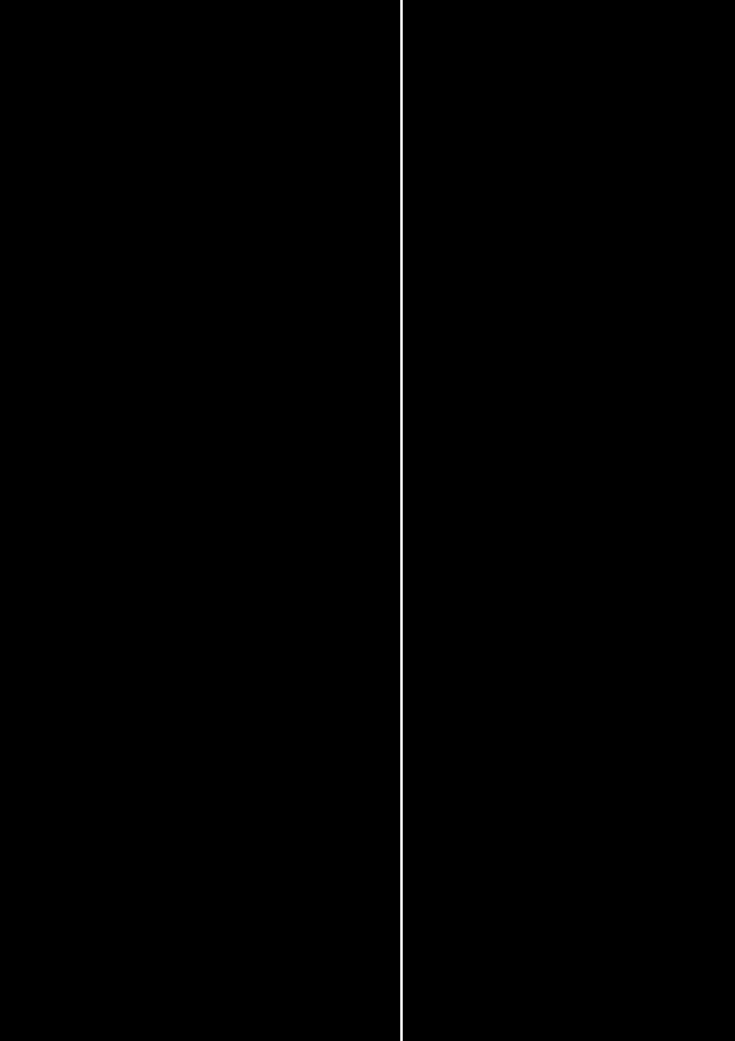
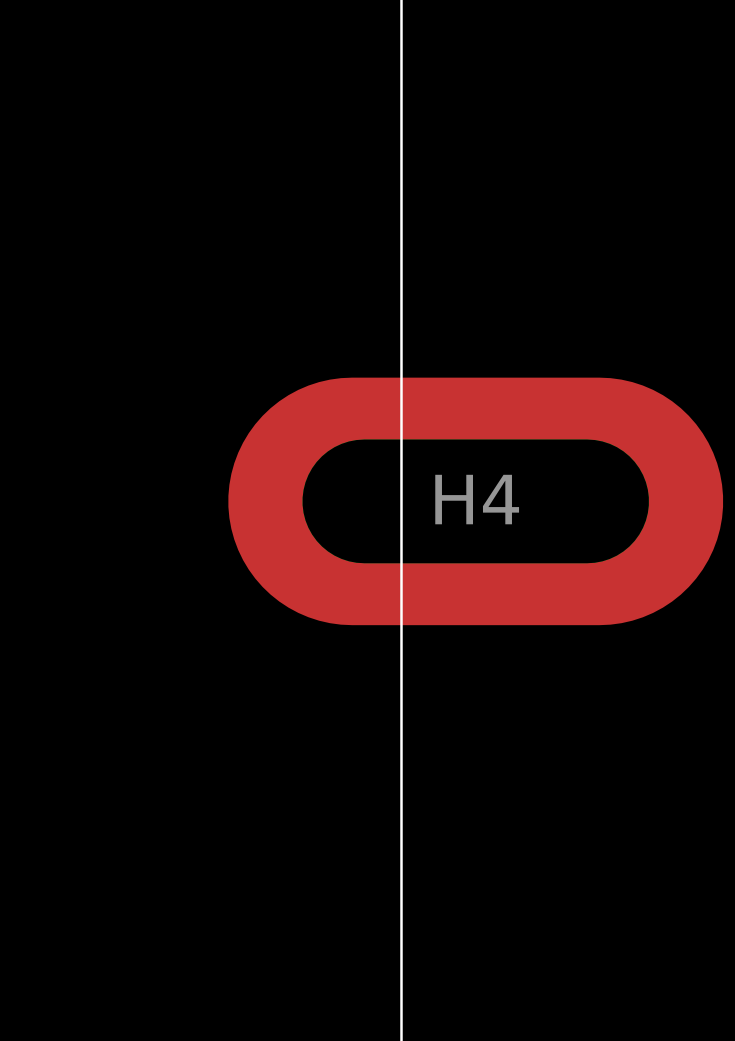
H4: none -> (475, 501)

